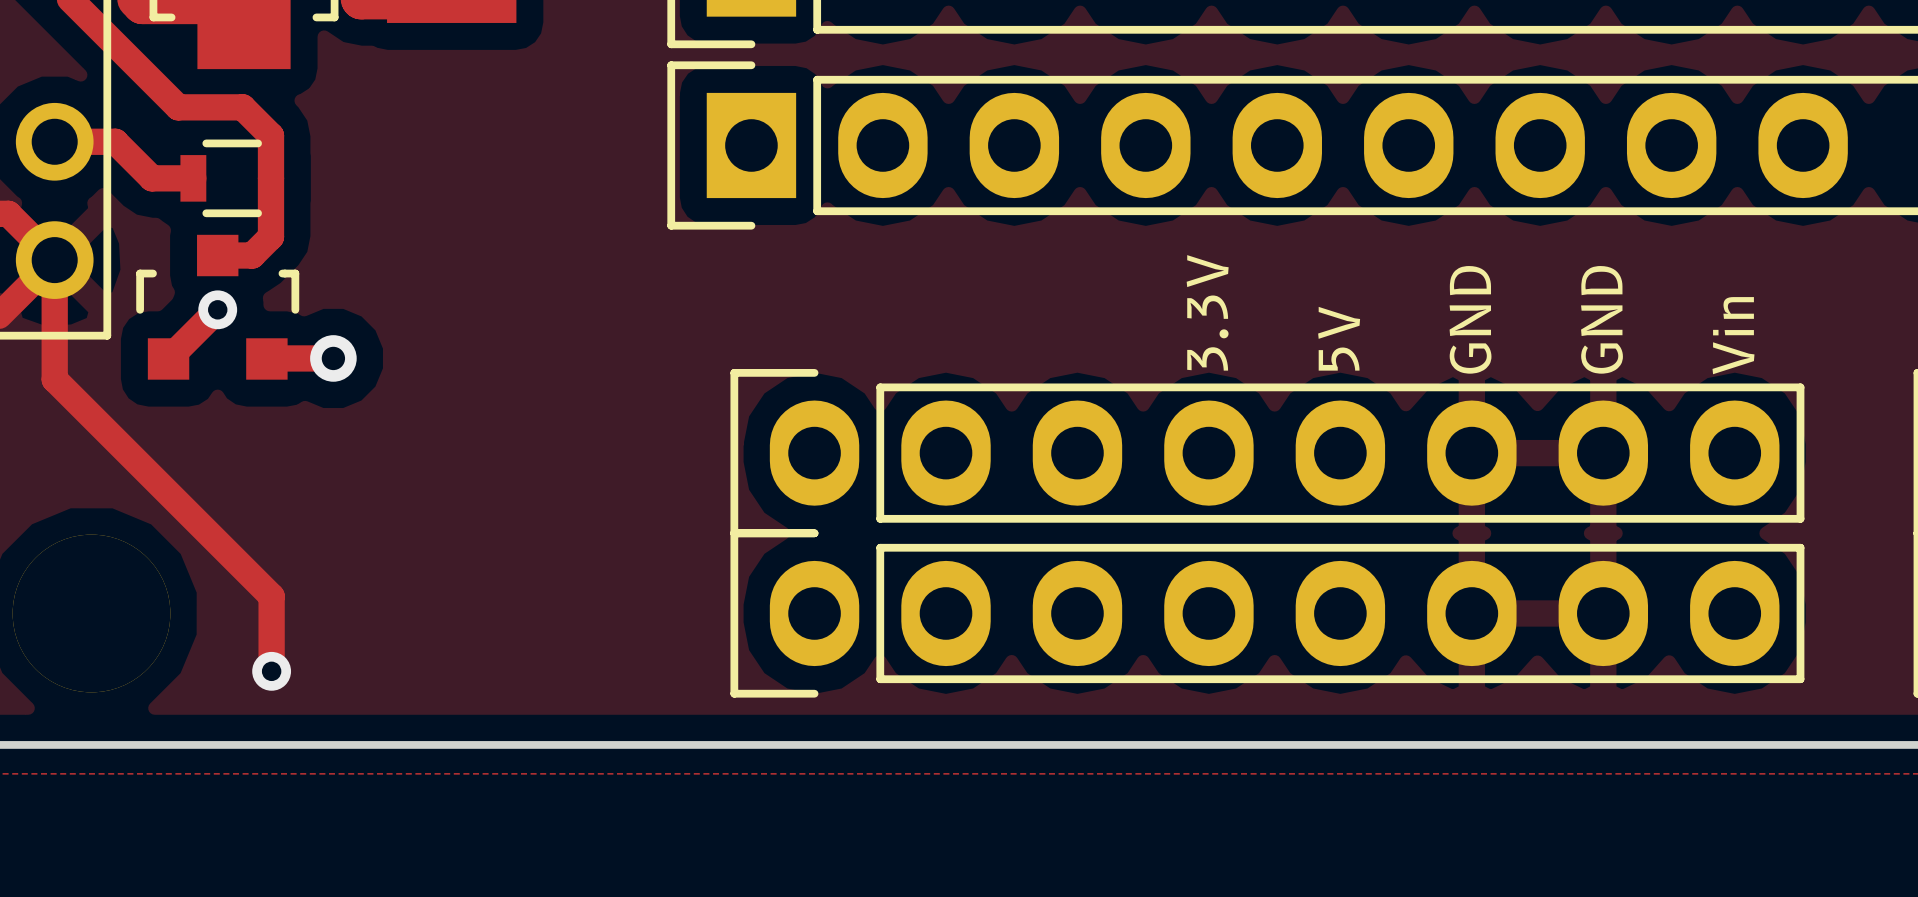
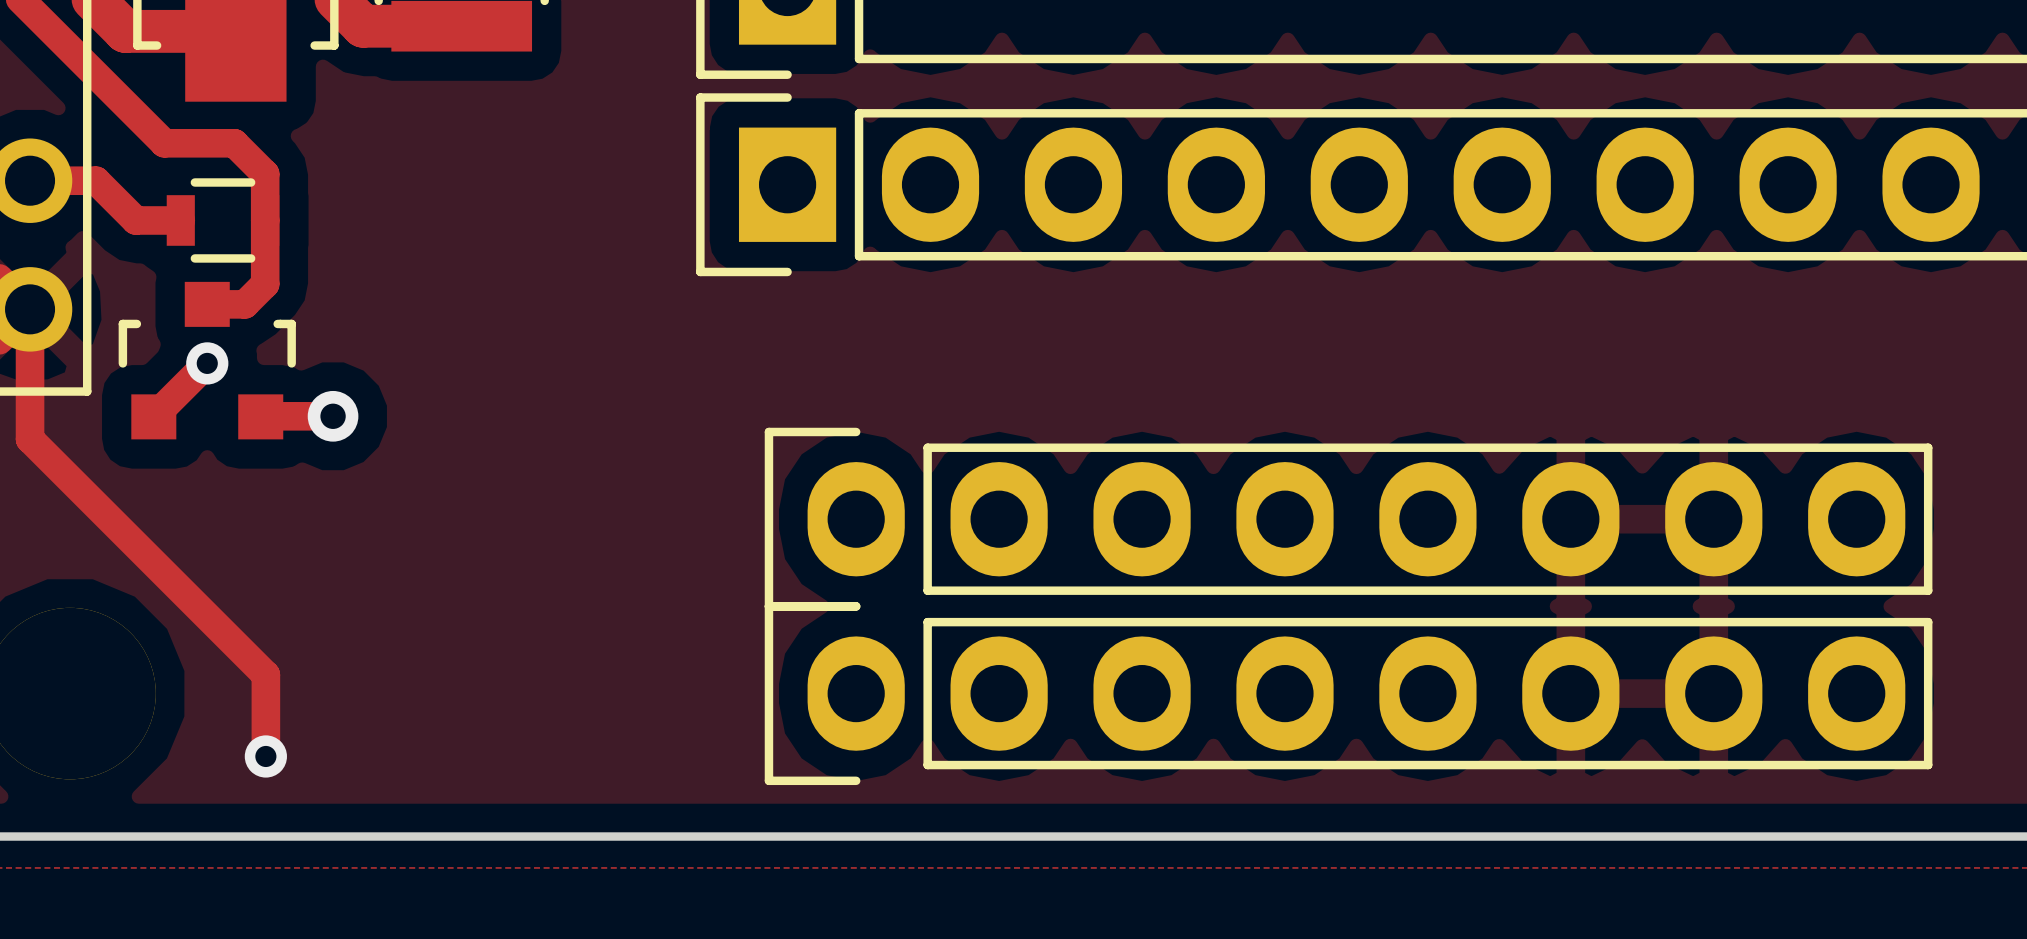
text: 3.3V (1207, 312) -> none
text: GND (1470, 319) -> none
text: GND (1601, 319) -> none
text: Vin (1733, 335) -> none
text: 5V (1339, 338) -> none

